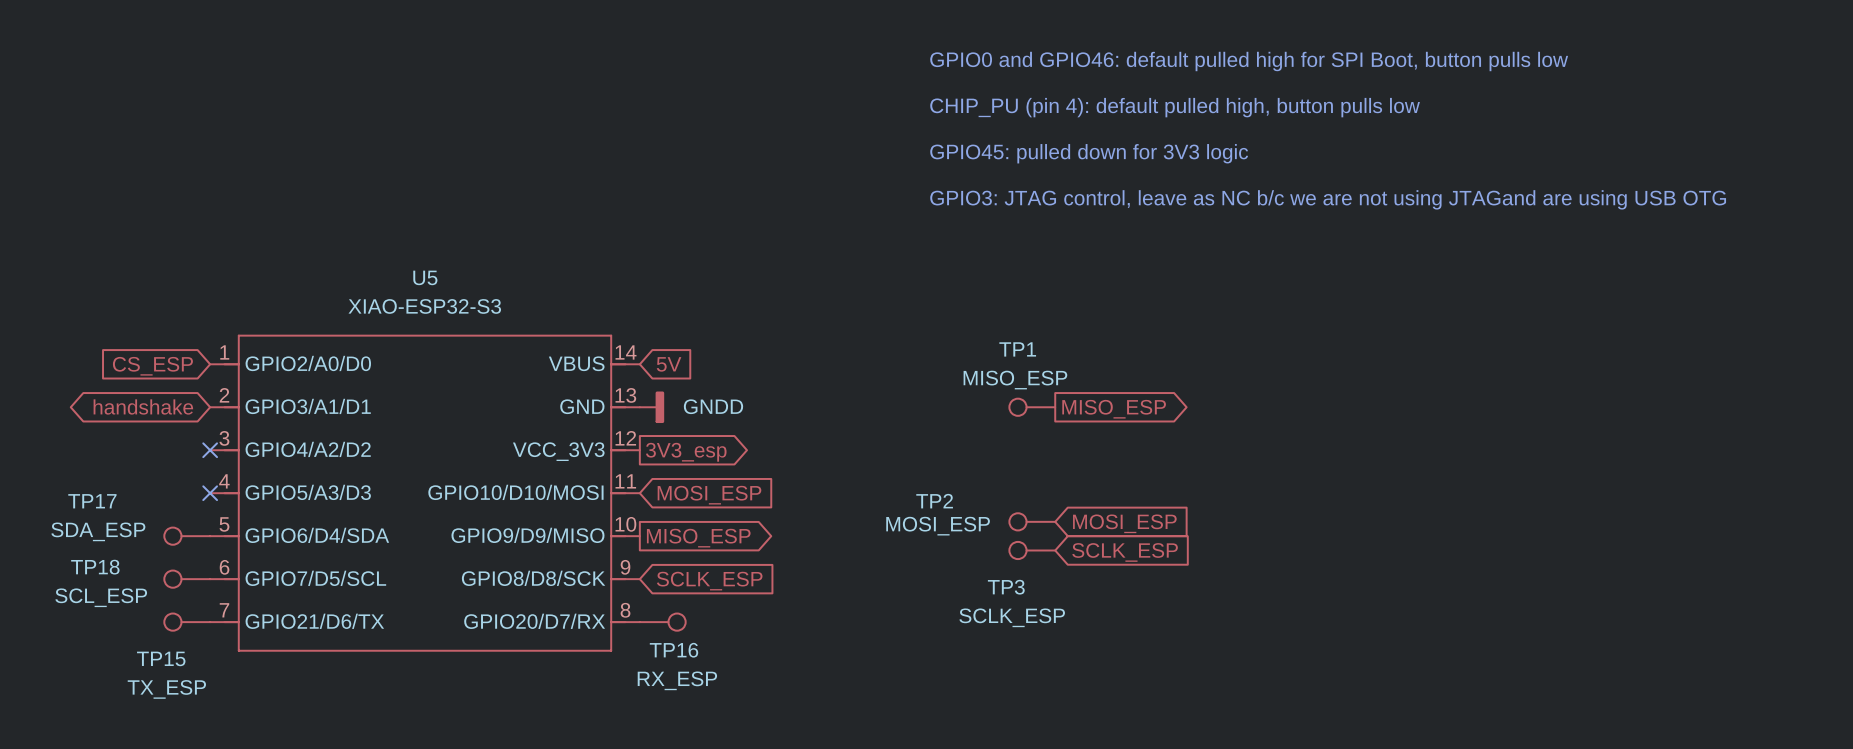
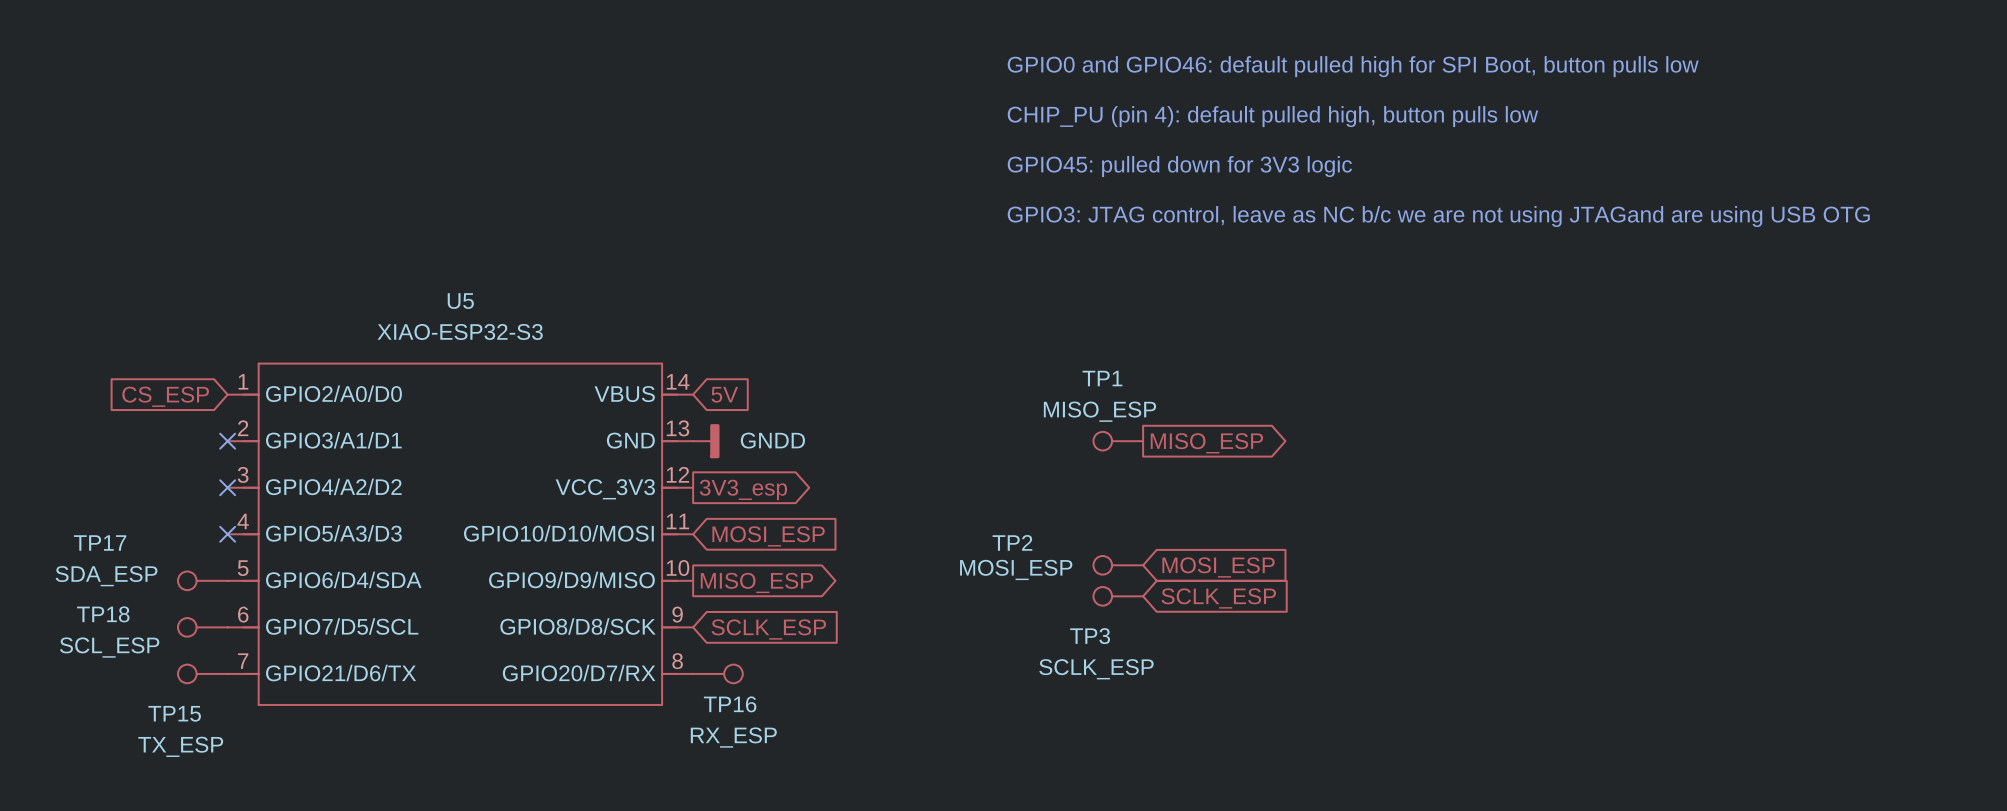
global label: handshake (143, 406) -> none
no-connect mark: none -> (227, 441)

